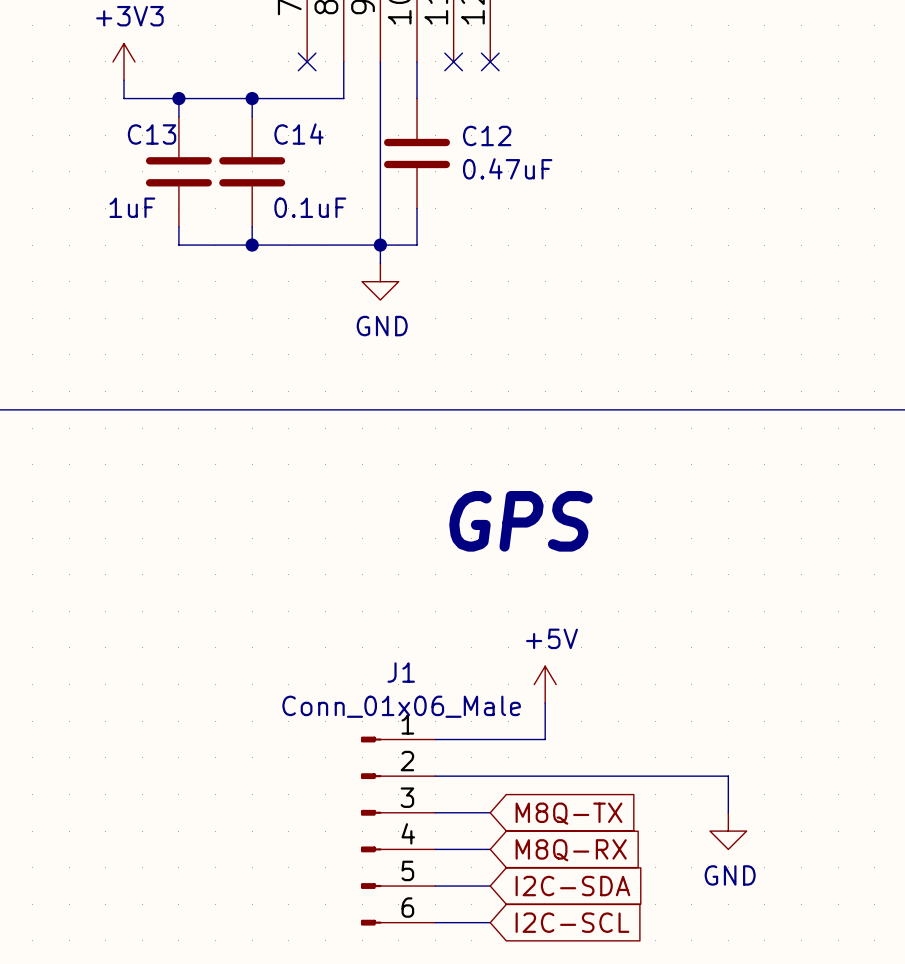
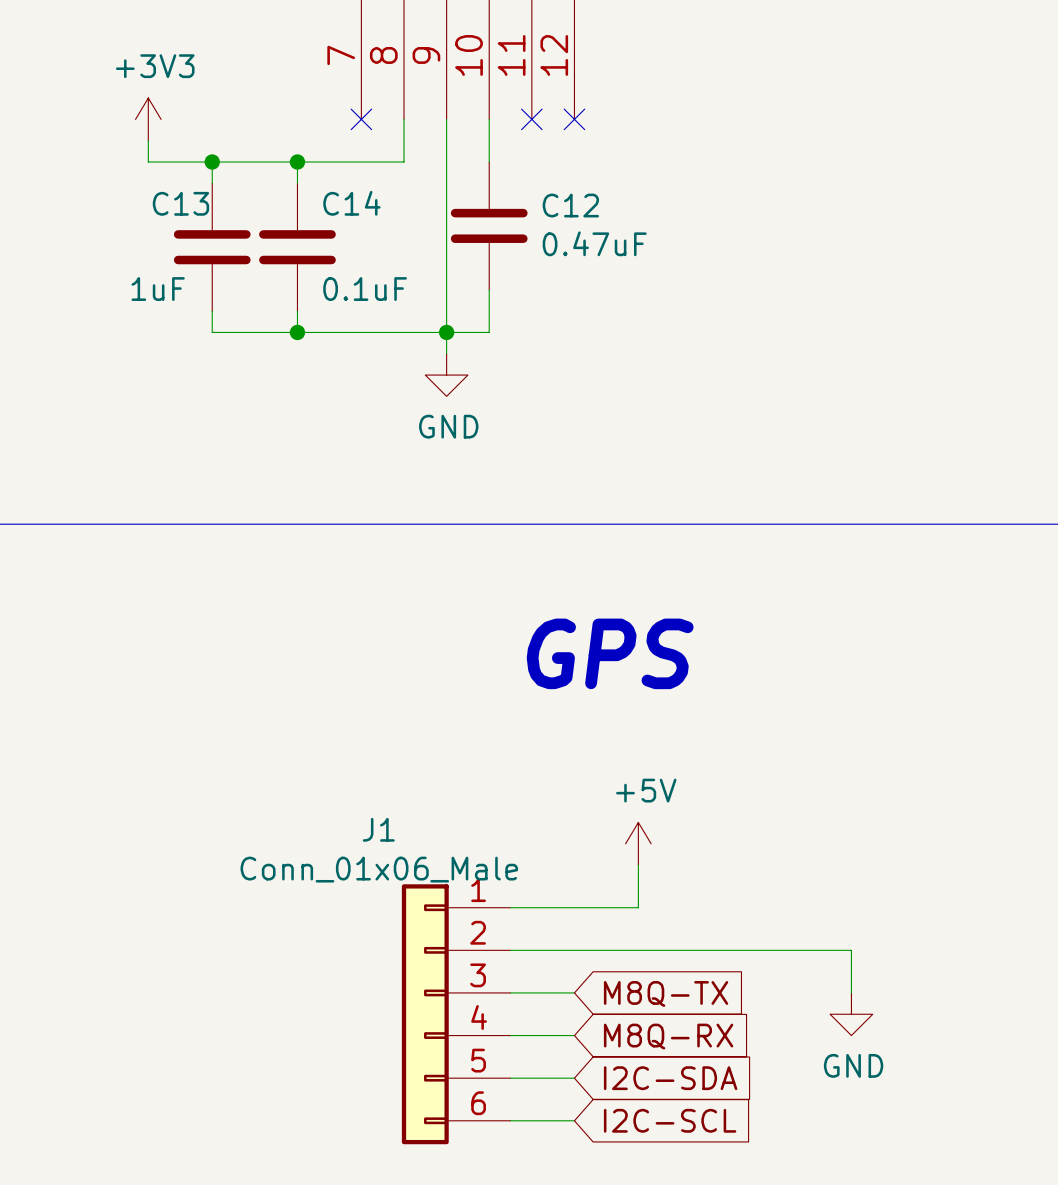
J1 name position: J1 (401, 672) -> J1 (378, 829)
J1 value position: Conn_01x06_Male (401, 706) -> Conn_01x06_Male (379, 869)
J1 symbol: [360, 736, 436, 926] -> [401, 884, 511, 1145]

